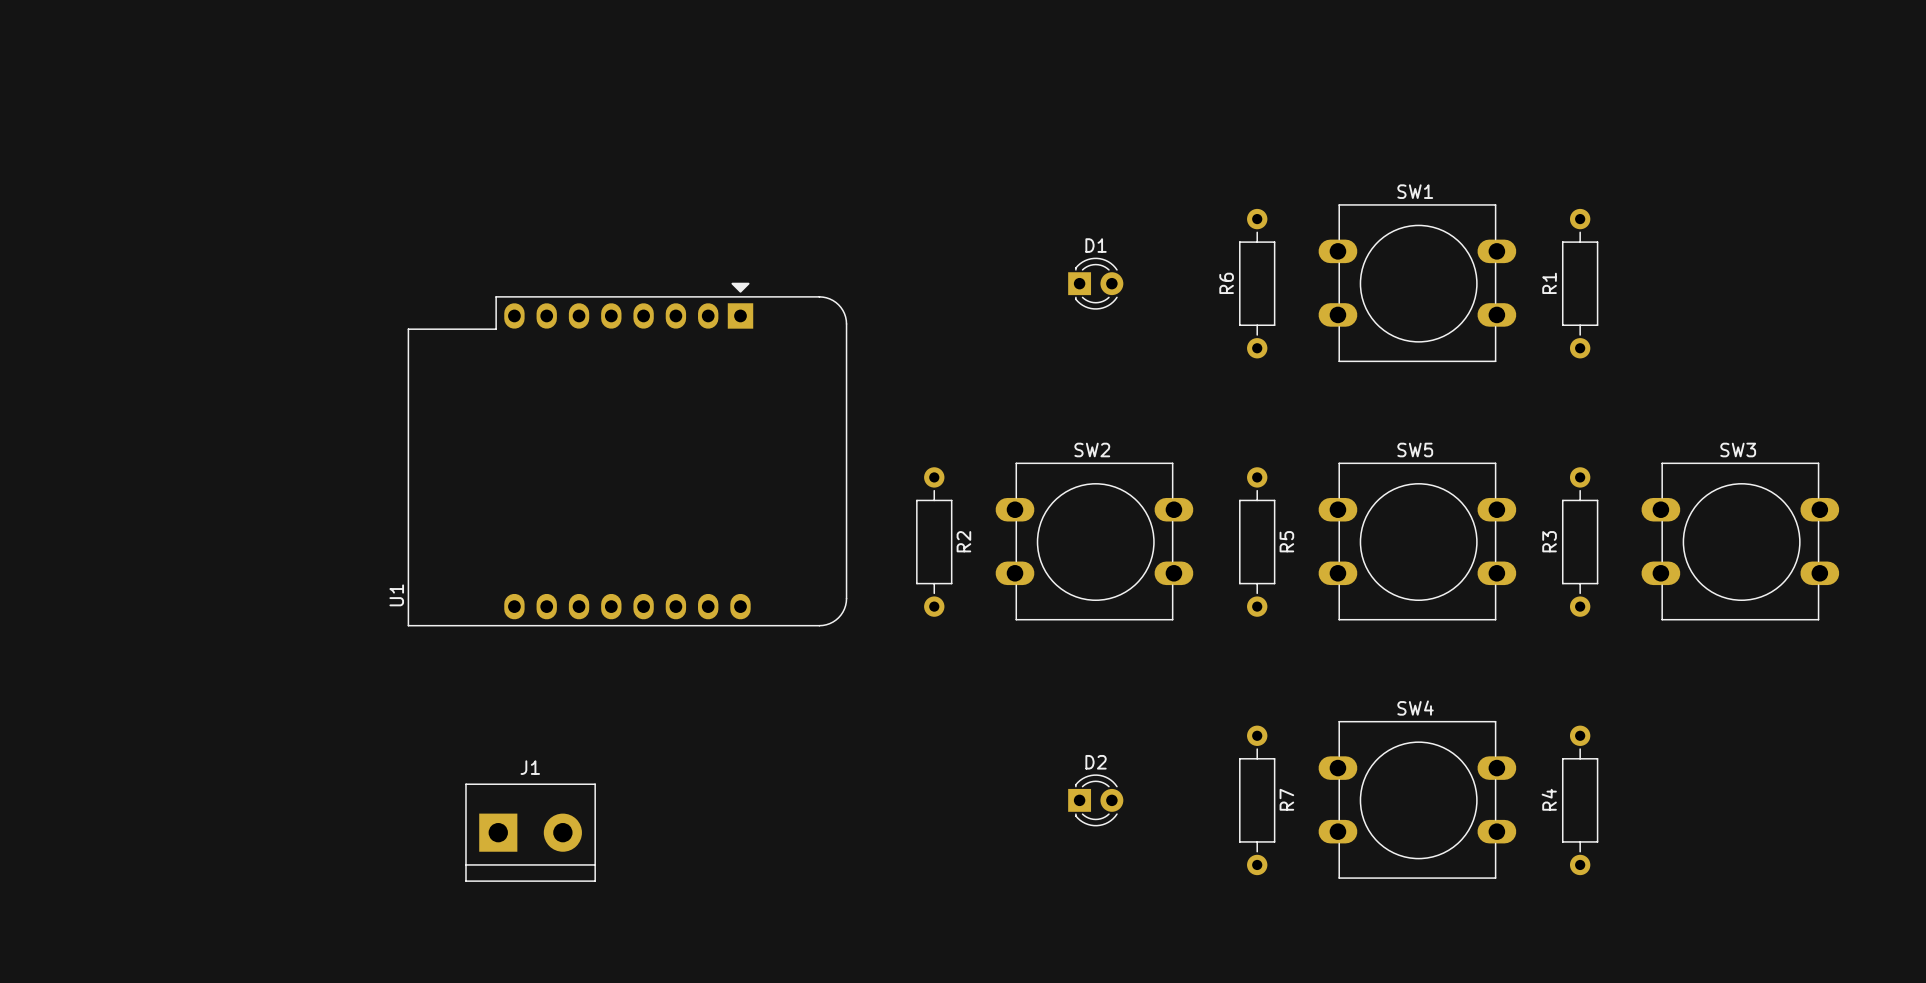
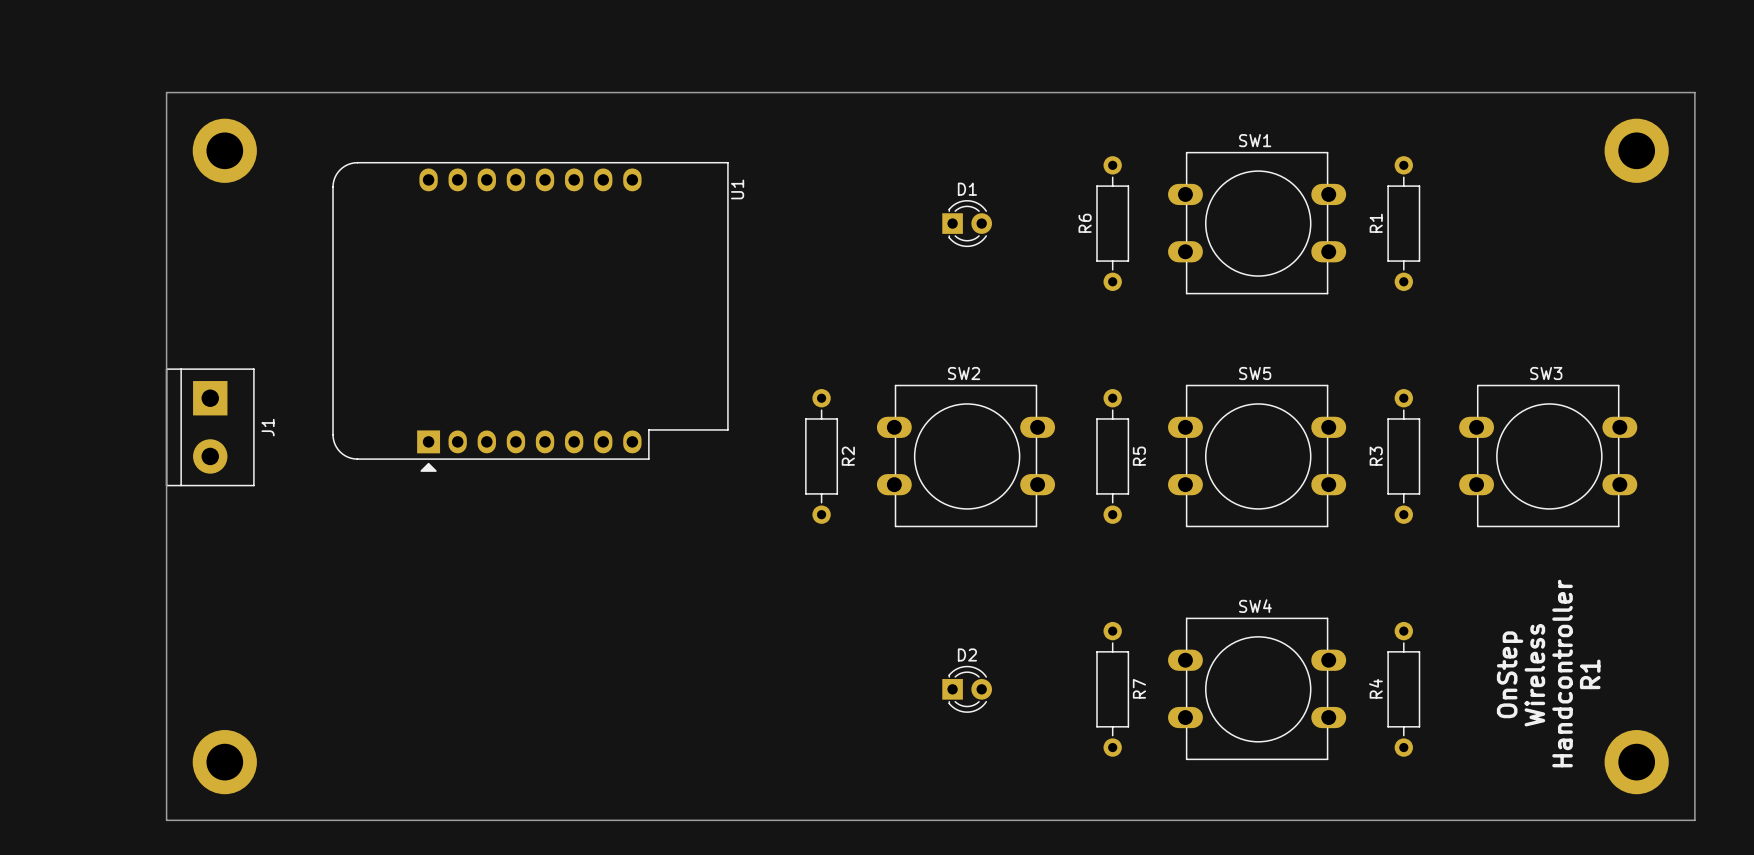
board edge: none -> (166, 92) (166, 820) (1694, 820) (1694, 92) (166, 92)
part: none -> (224, 150)
part: none -> (1636, 150)
U1 rotation: 0° (627, 454) -> 180° (530, 316)
text: none -> Handcontroller (1562, 673)
text: none -> R1 (1590, 674)
text: none -> OnStep (1510, 674)
text: none -> Wireless (1534, 675)
J1 rotation: 0° (530, 832) -> 90° clockwise (210, 427)
J1 position: (530, 832) -> (210, 427)
part: none -> (224, 762)
part: none -> (1636, 762)

